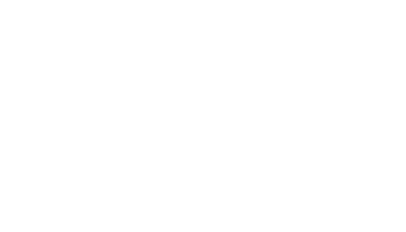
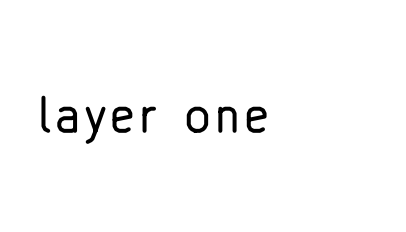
label: none -> layer one (154, 119)

